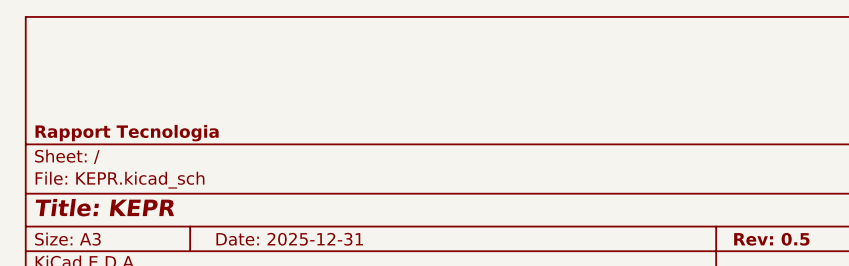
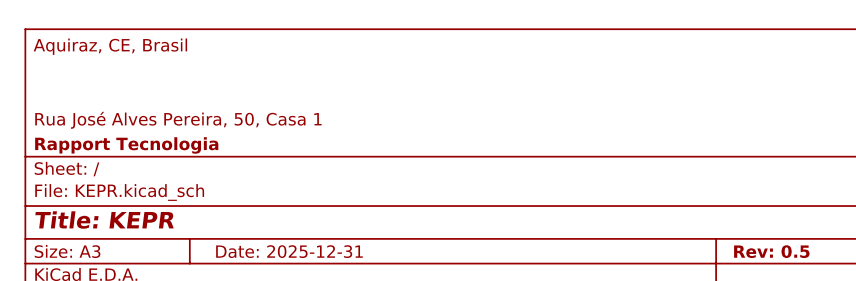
title block: none -> Aquiraz, CE, Brasil (110, 46)
title block: none -> Rua José Alves Pereira, 50, Casa 1 (178, 120)

